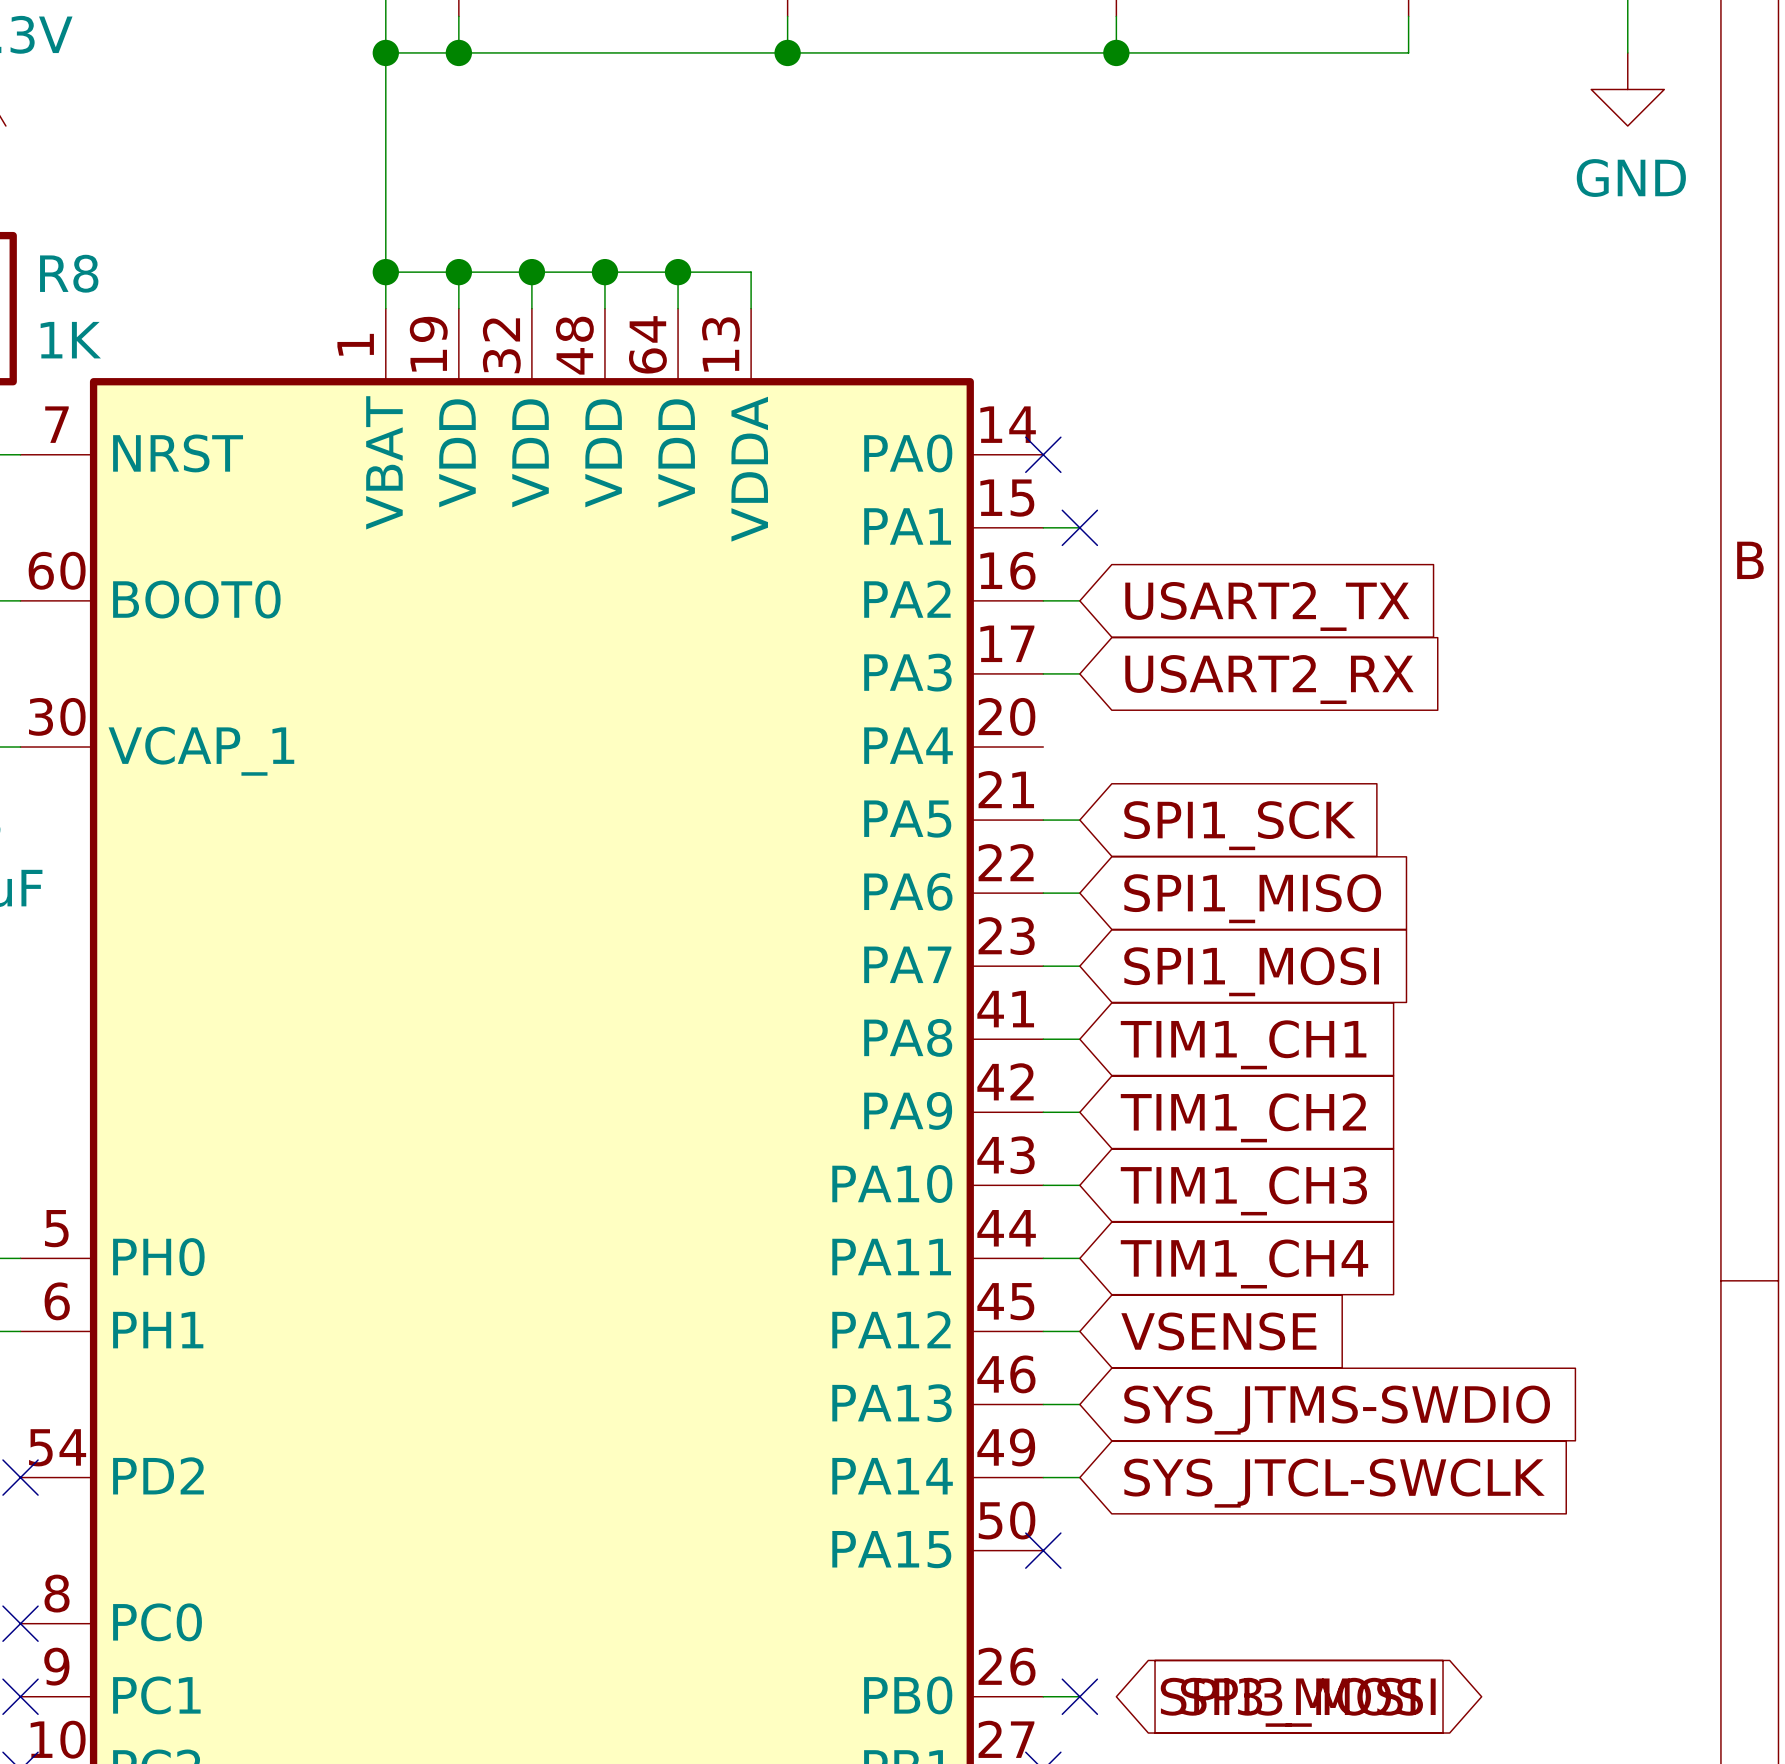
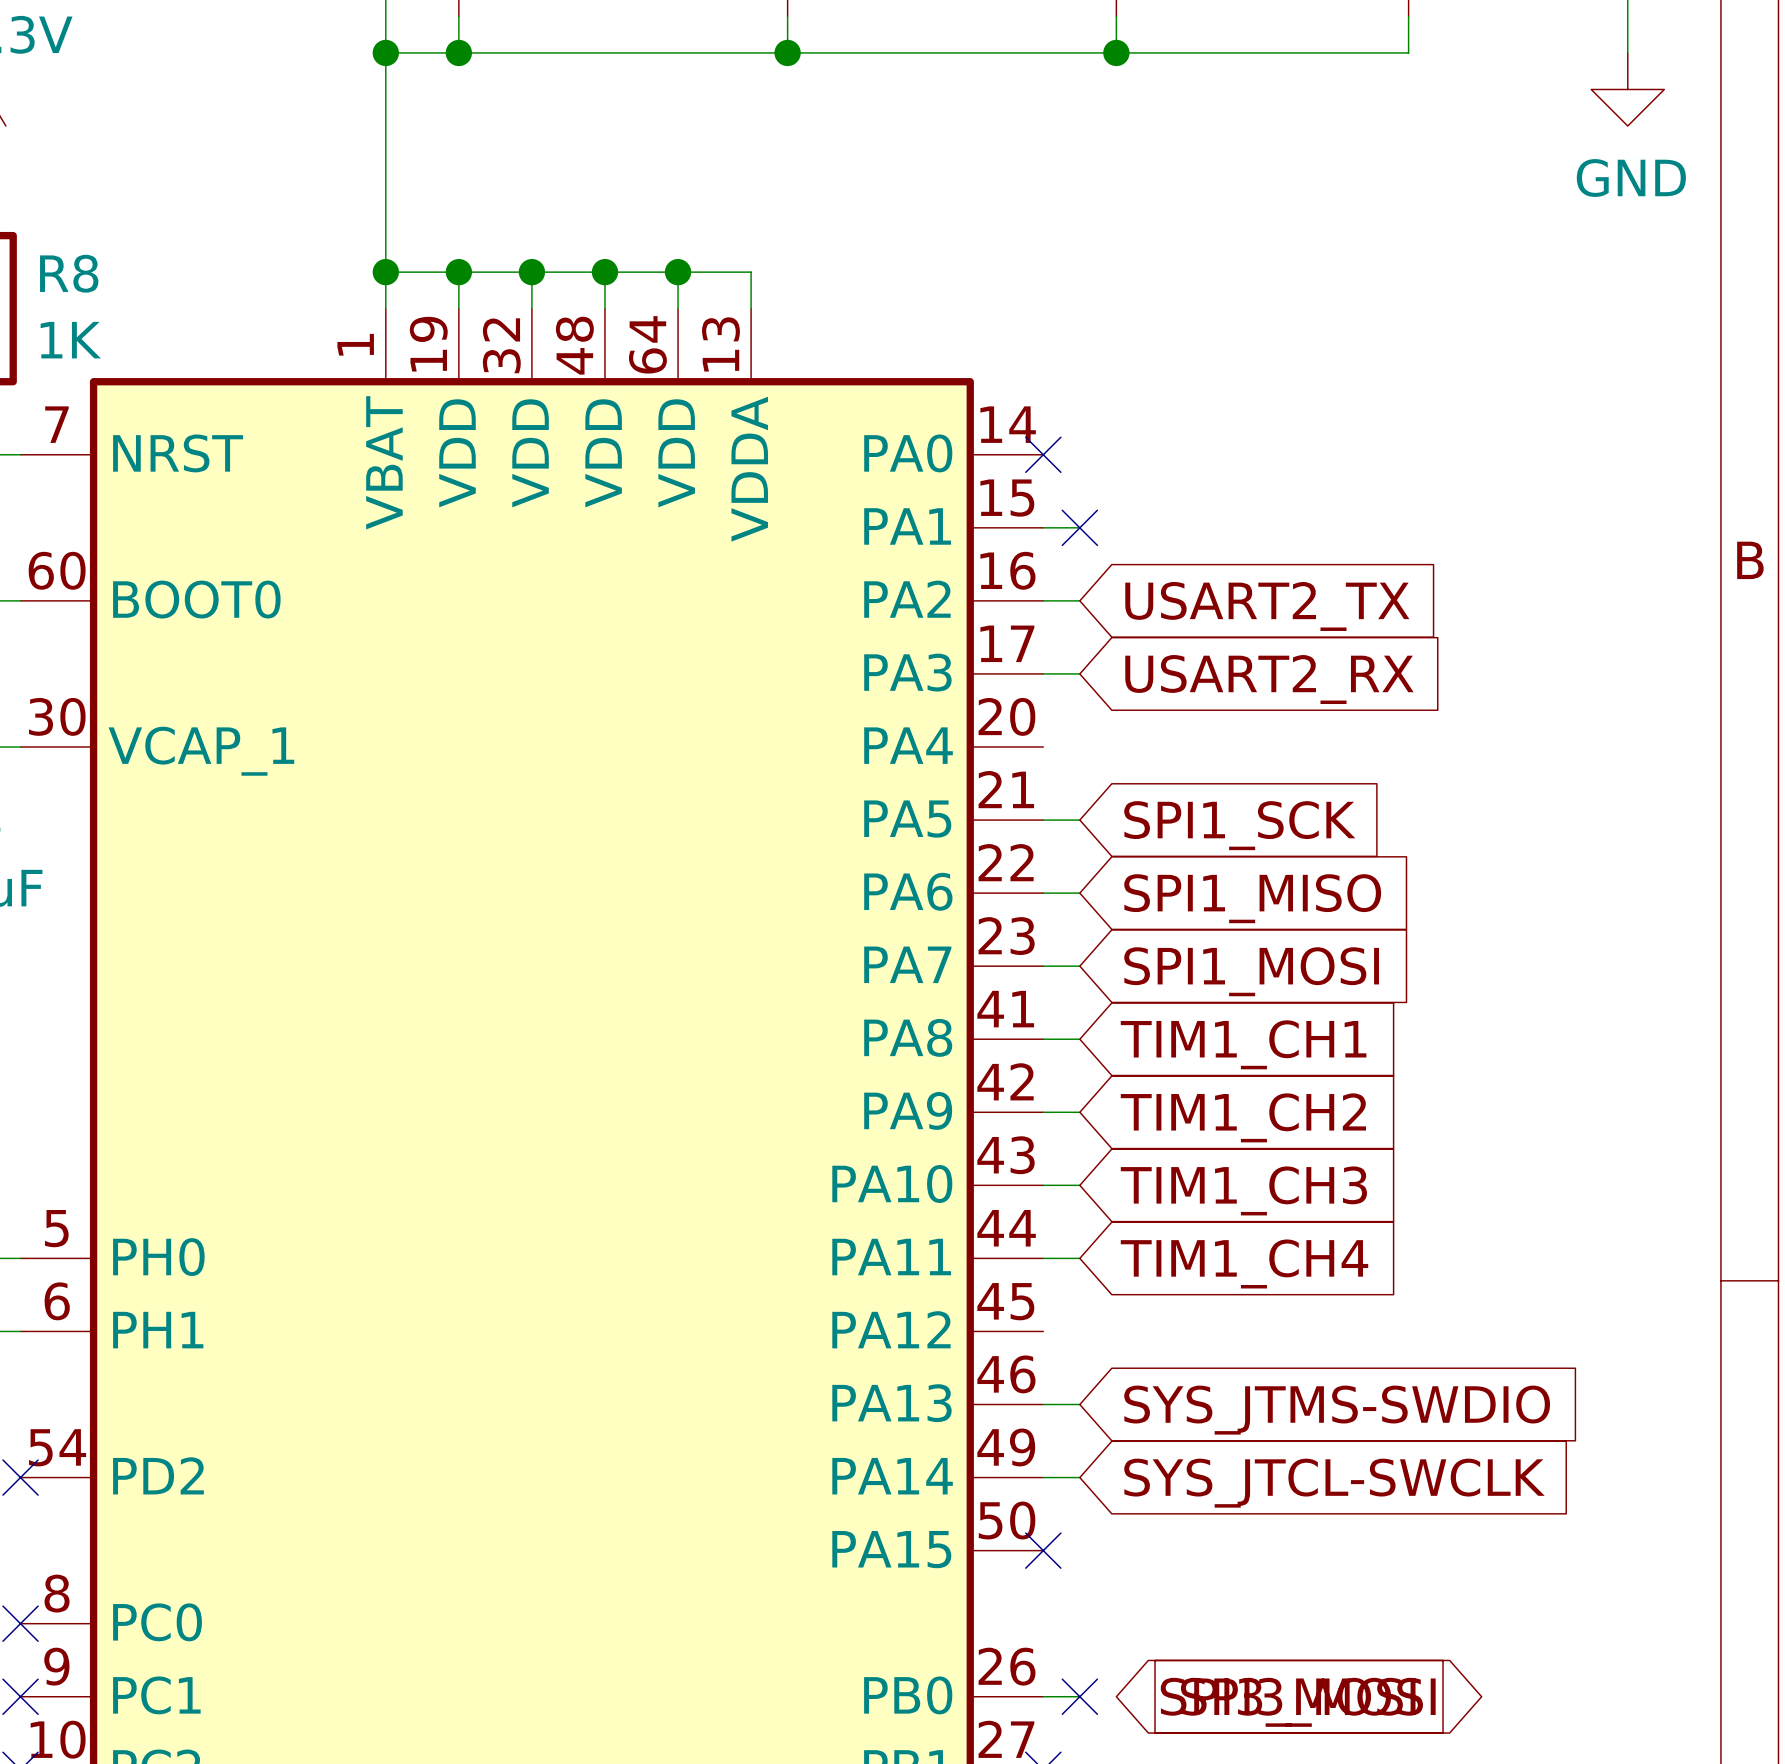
wire: (1043, 1331) (1079, 1331) -> none
global label: VSENSE (1218, 1331) -> none

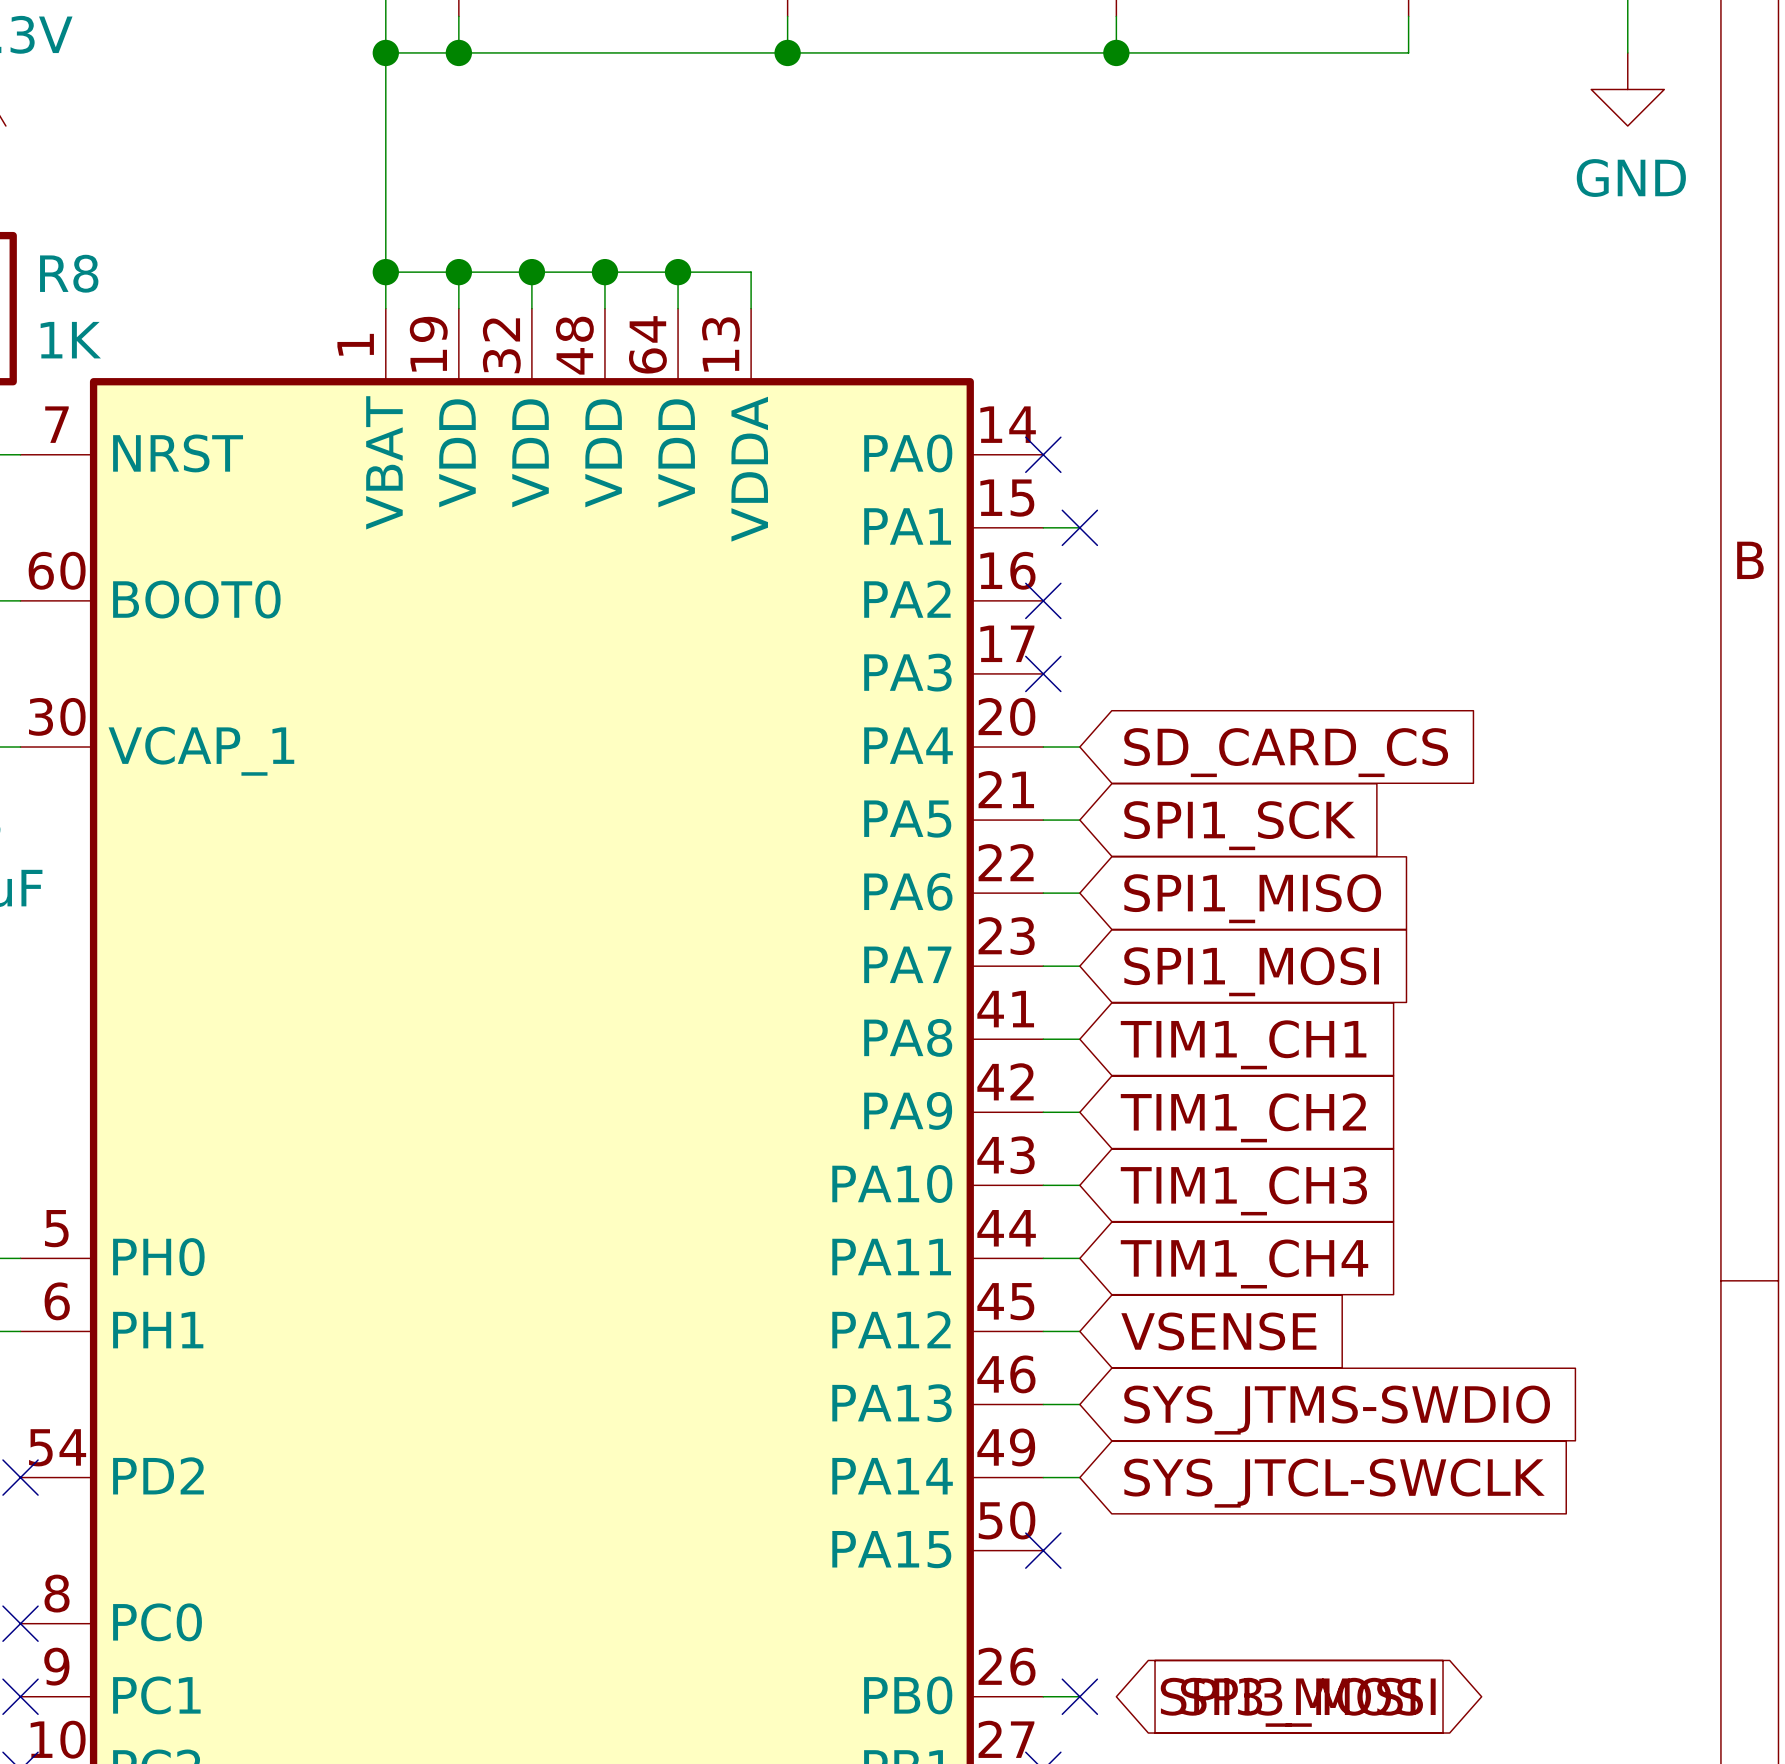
wire: (1043, 600) (1079, 600) -> none
no-connect mark: none -> (1043, 600)
global label: USART2_TX (1267, 606) -> none
wire: (1043, 673) (1079, 673) -> (1043, 747) (1079, 747)
no-connect mark: none -> (1043, 673)
global label: USART2_RX (1269, 679) -> none
global label: none -> SD_CARD_CS (1286, 752)
wire: none -> (1043, 1331) (1079, 1331)
global label: none -> VSENSE (1218, 1331)

